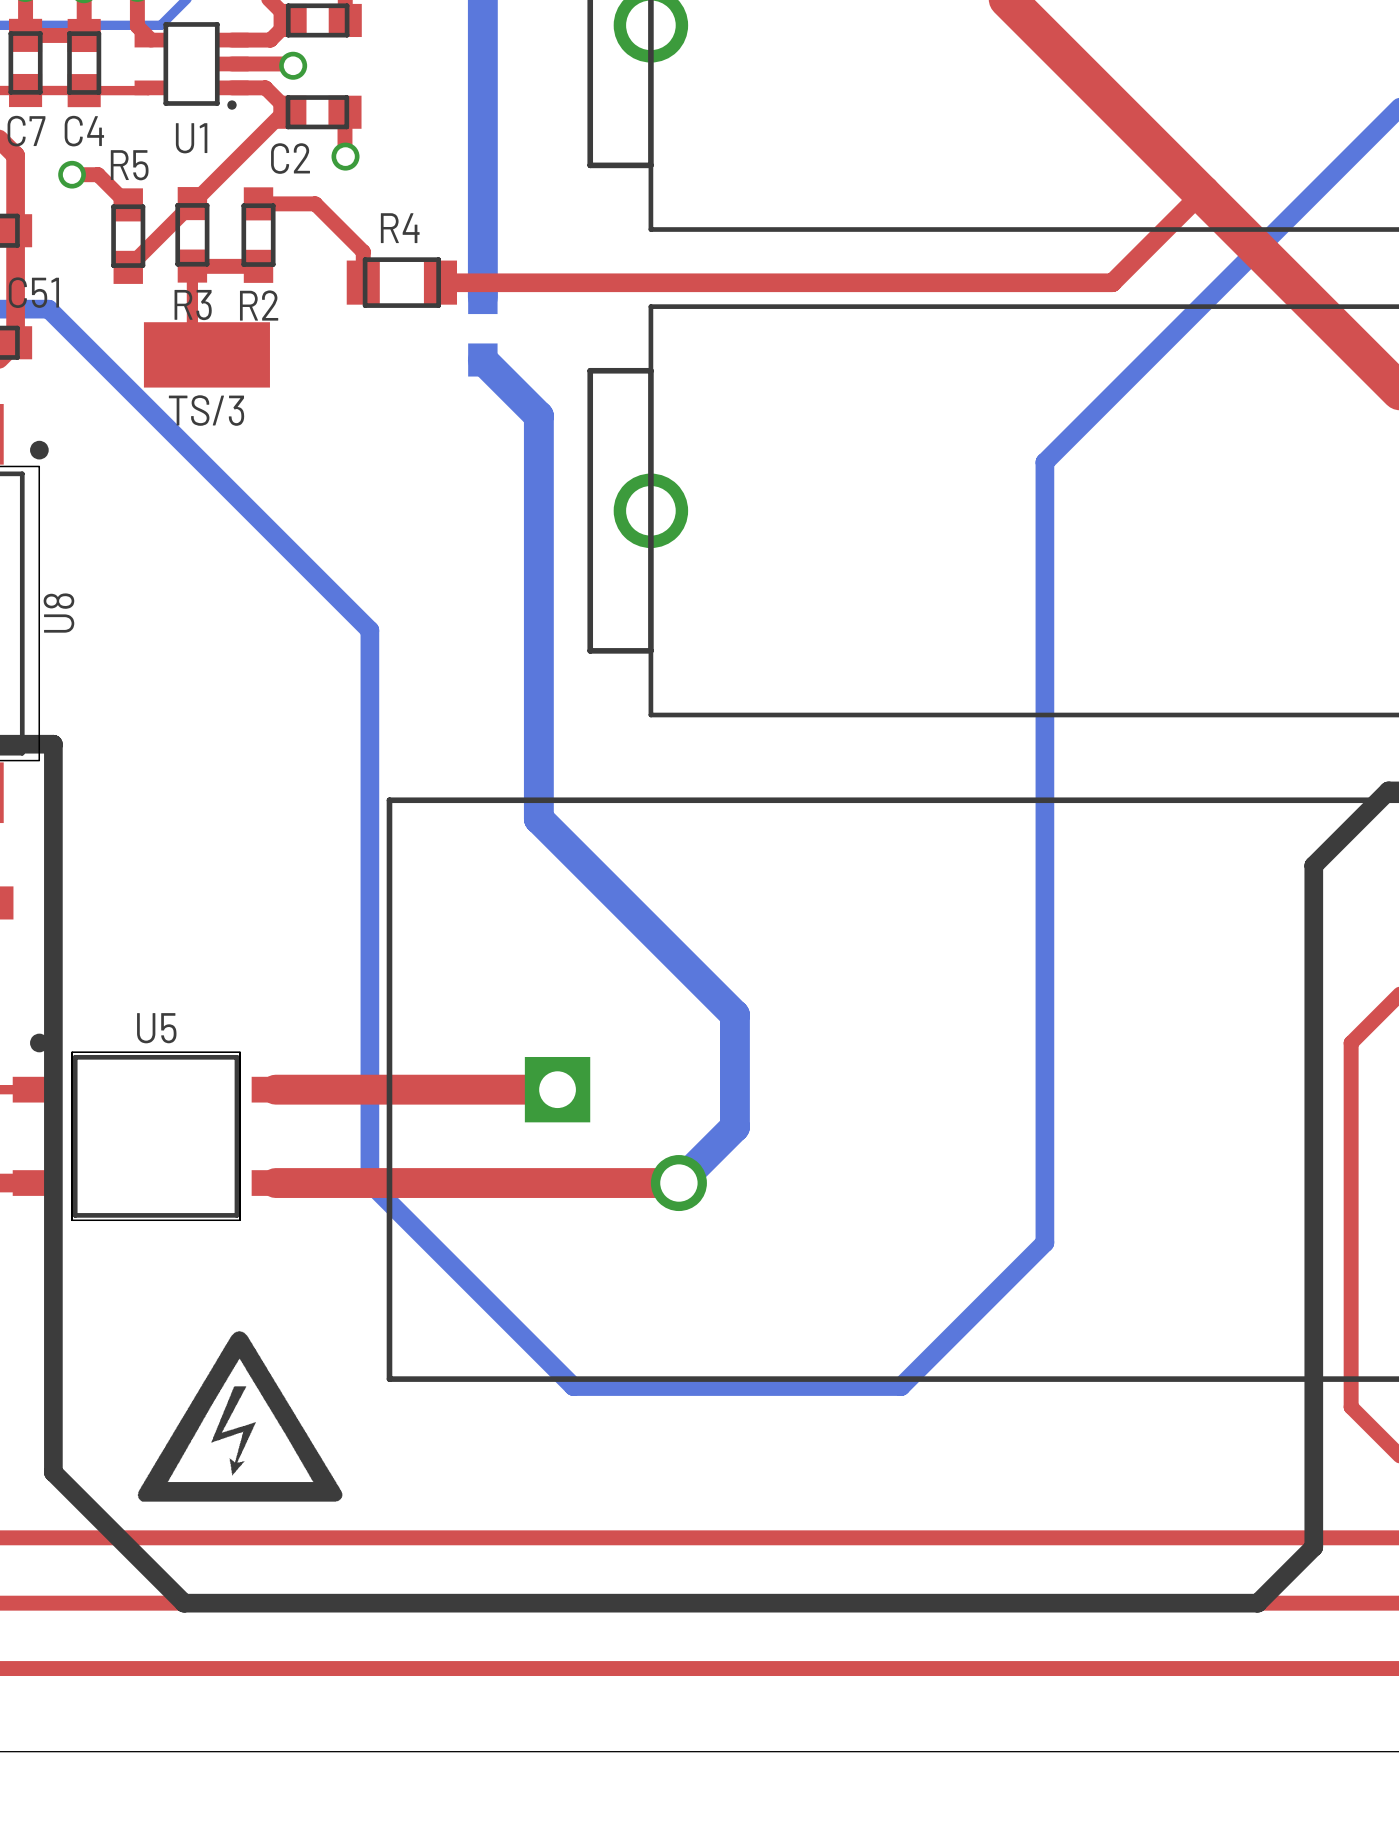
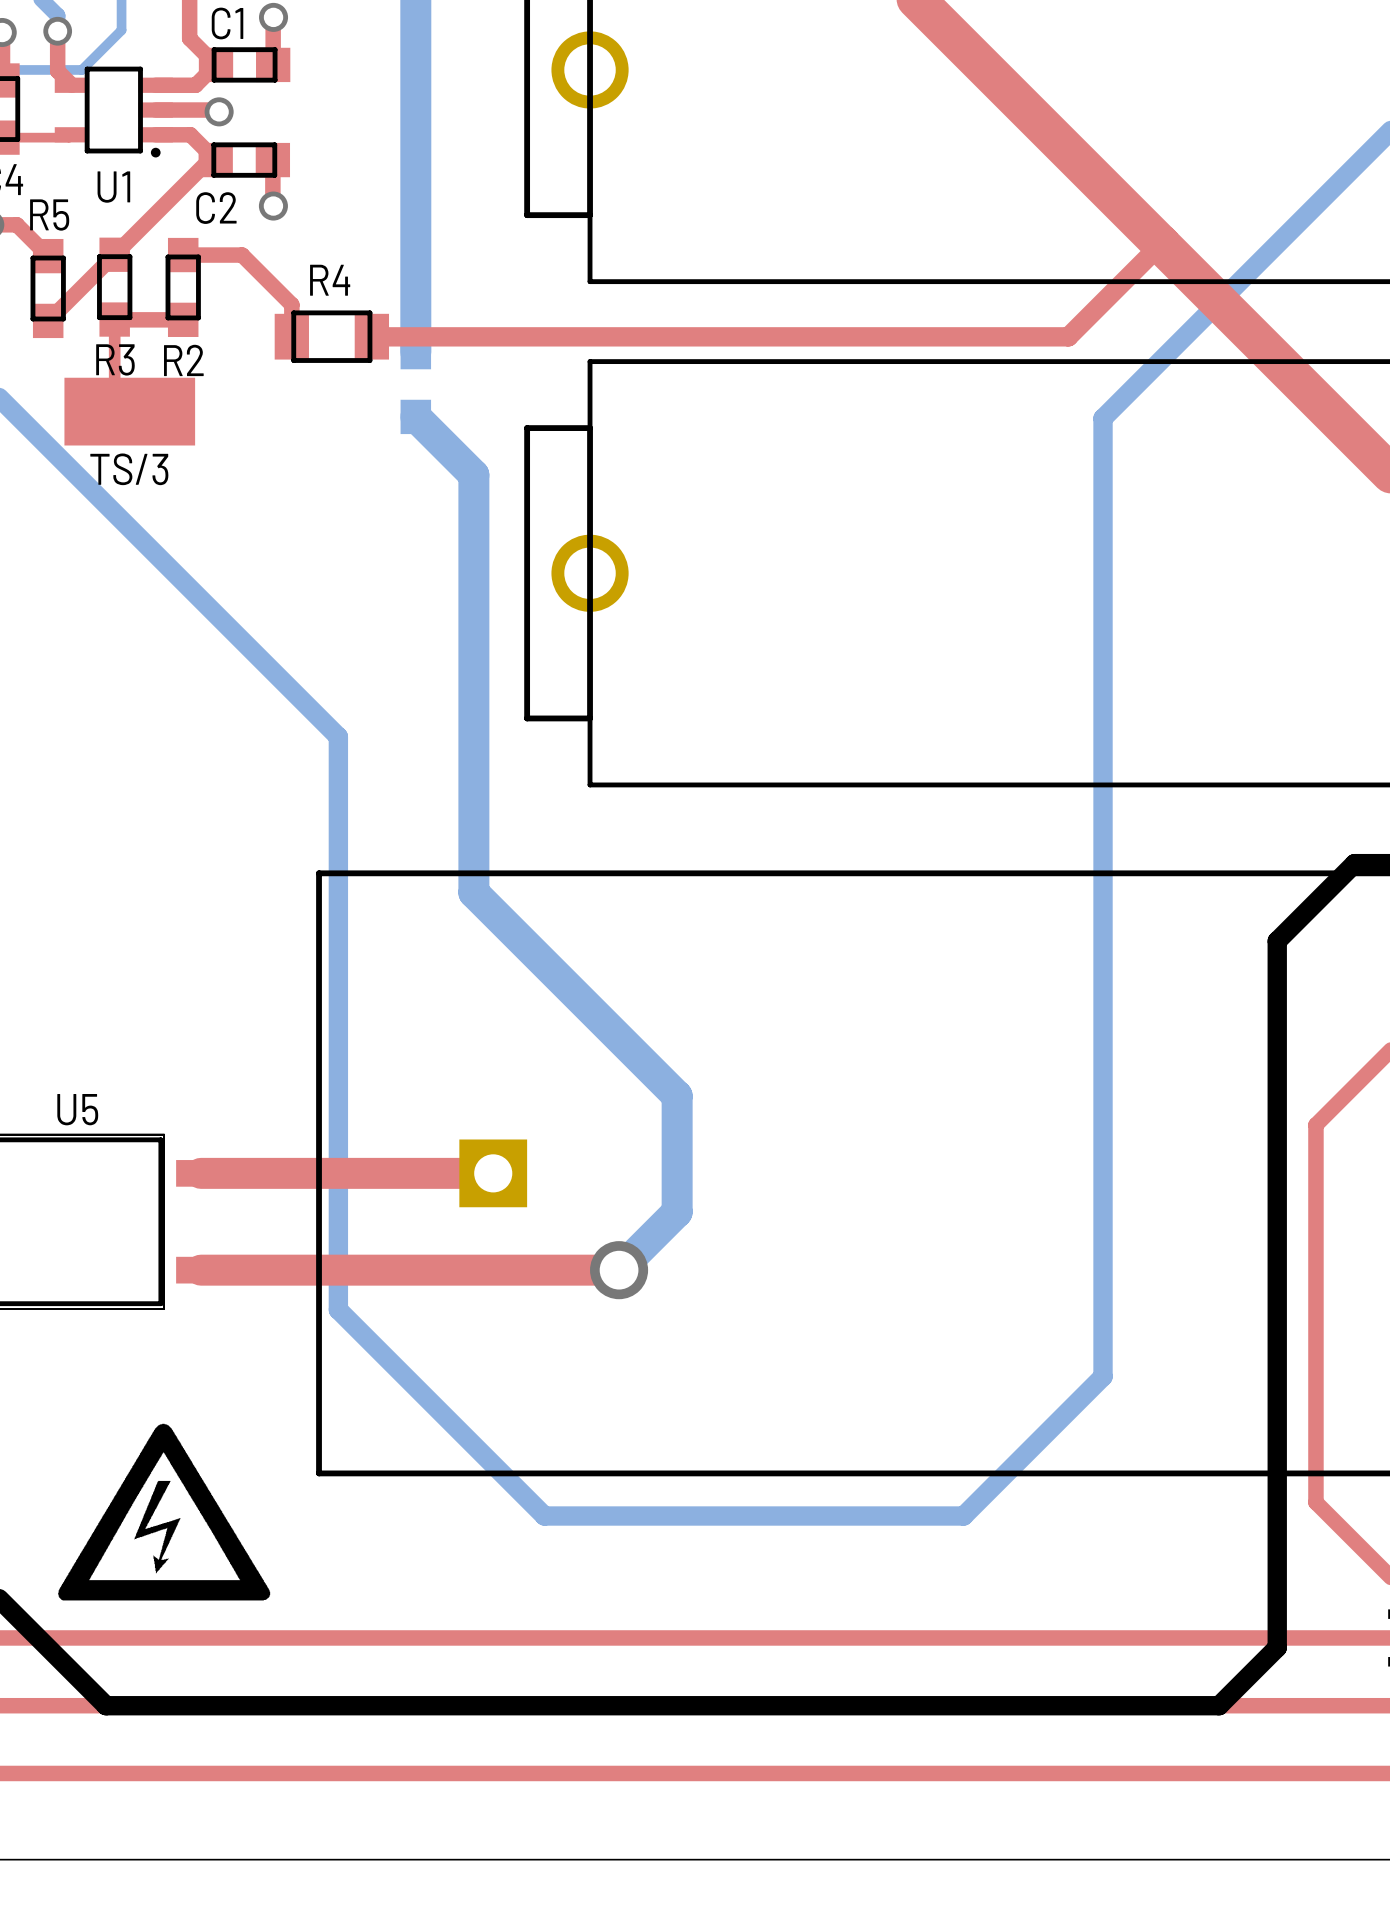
bottom track: (1145, 361) (1044, 462) (1044, 1242) (901, 1386) (573, 1386) -> (1103, 418) (1103, 1376) (963, 1516) (544, 1516) (509, 1481)
bottom track: (369, 630) (369, 1183) (408, 1221) -> (298, 697) (338, 736) (338, 1309)

